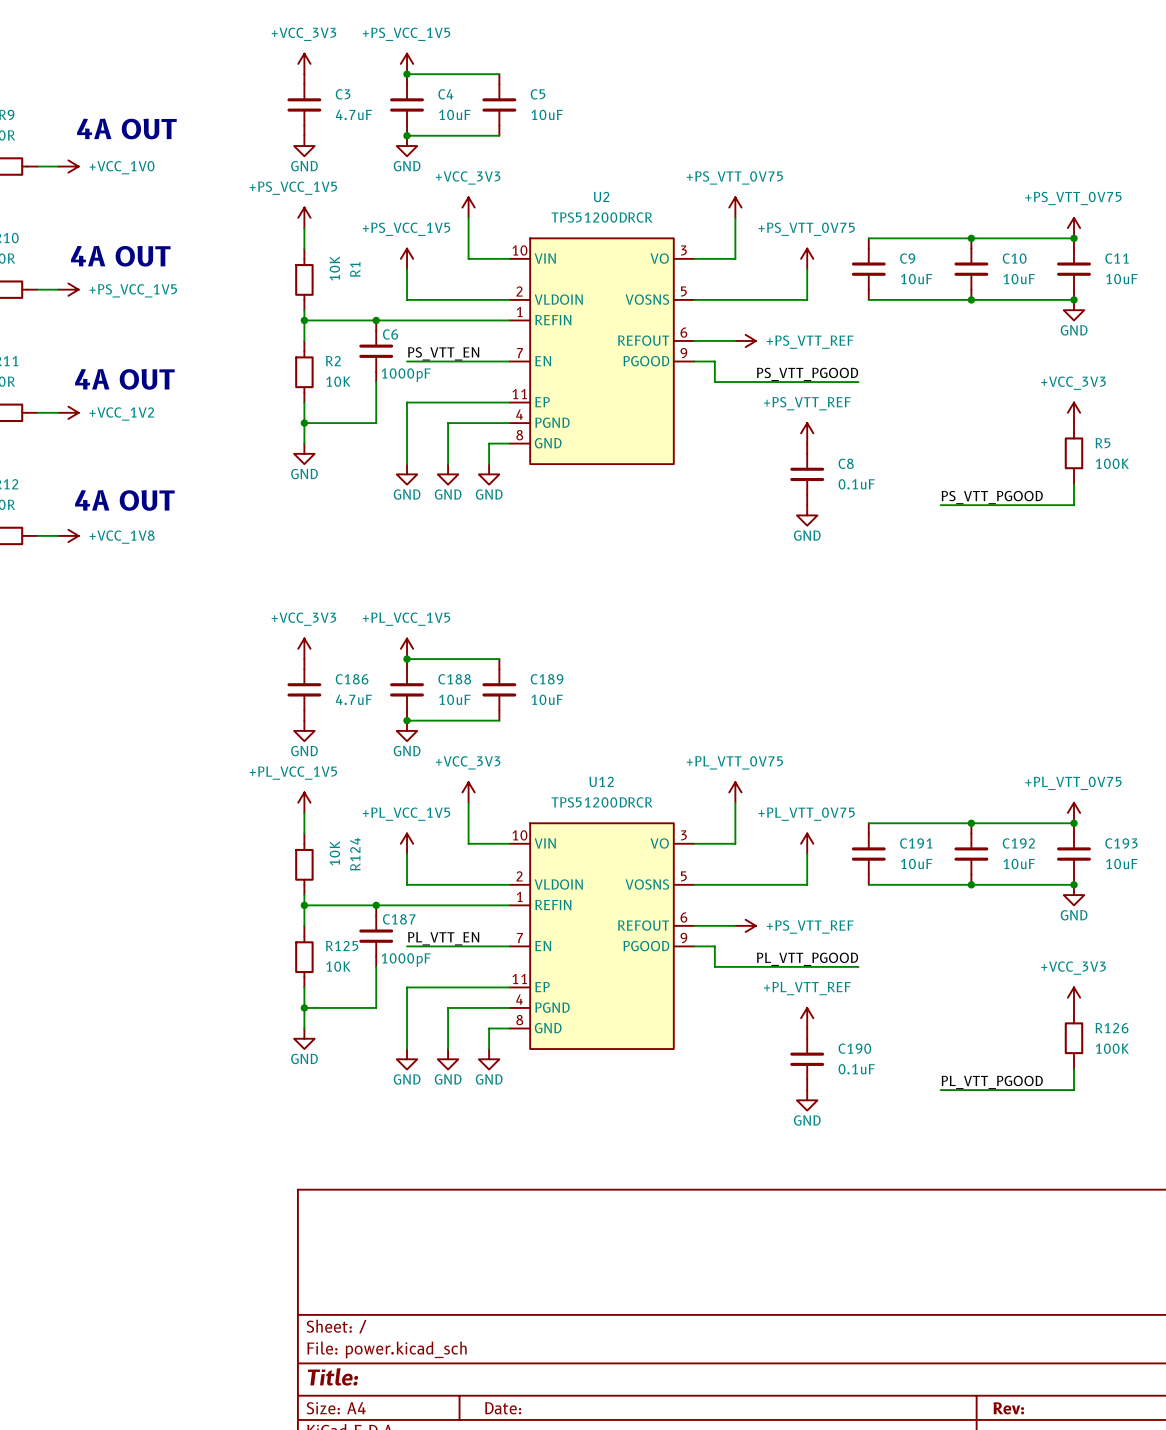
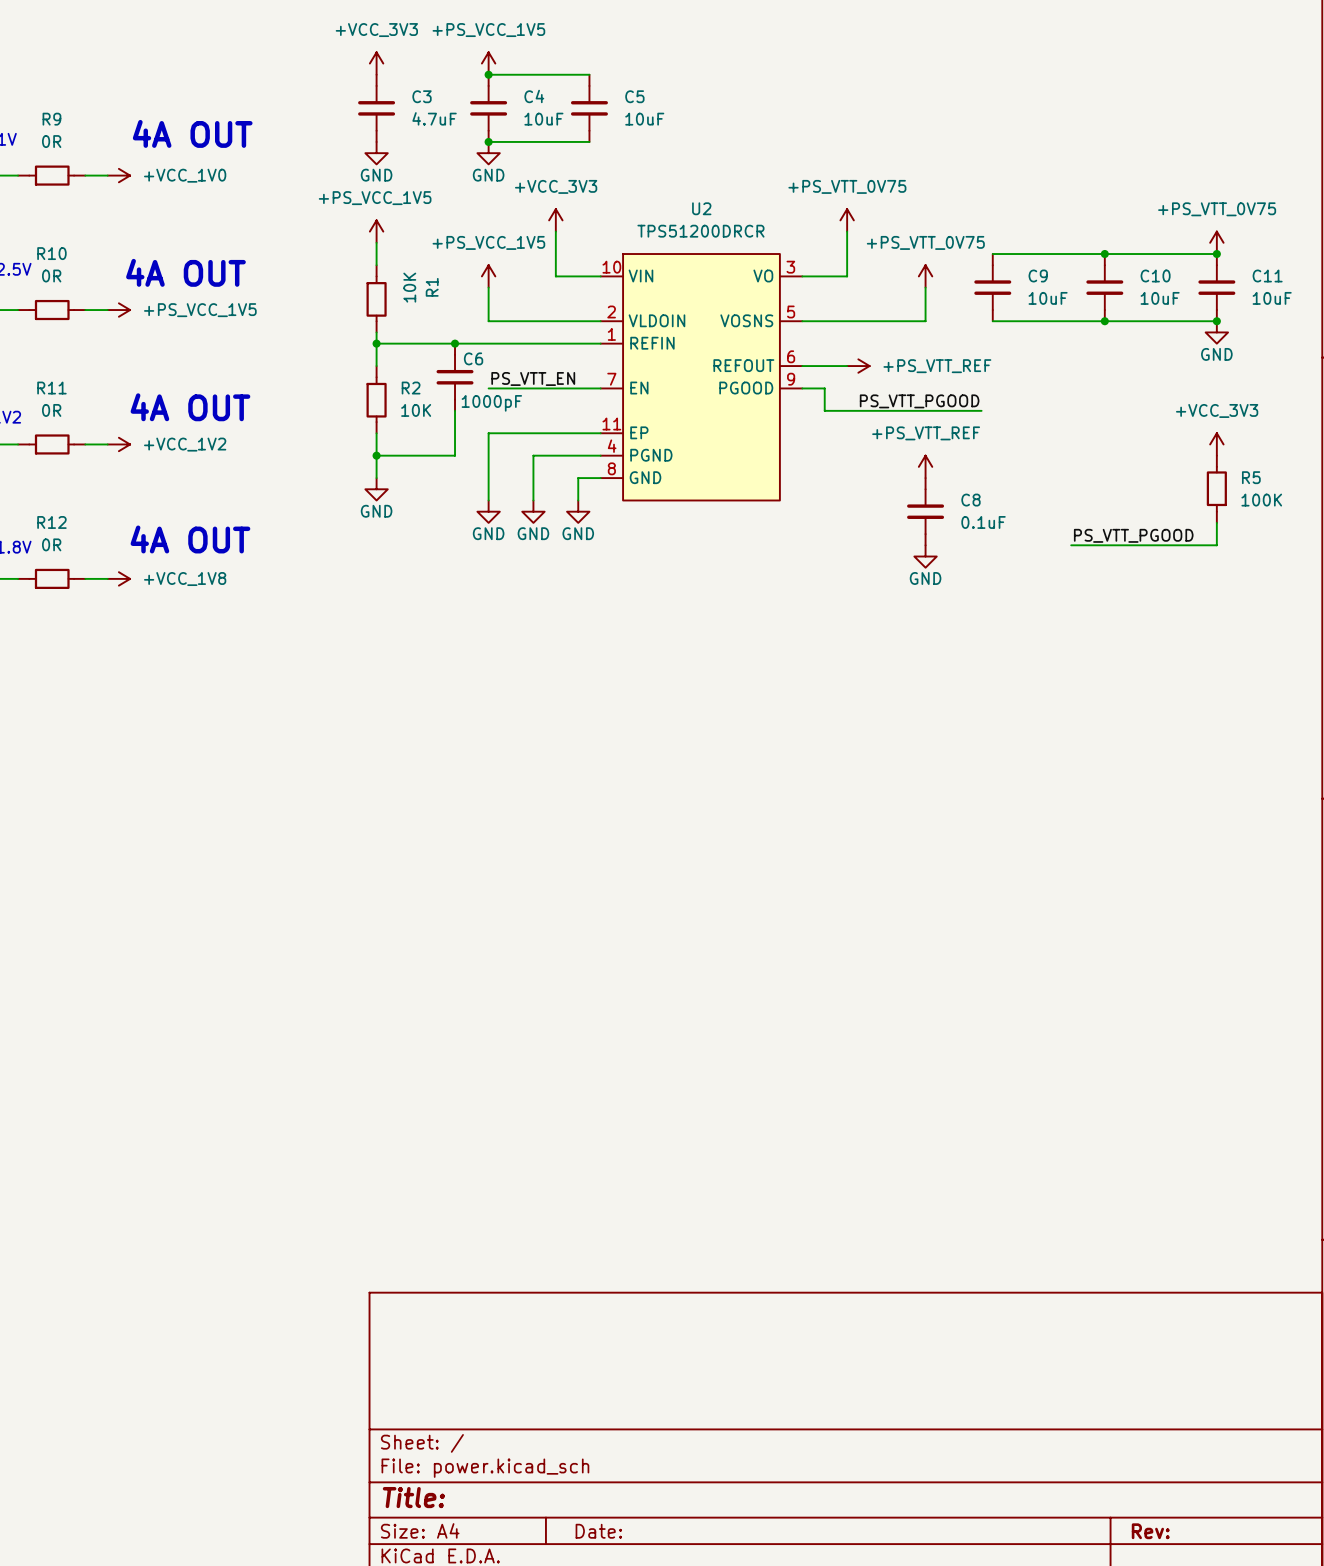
power symbol: +VCC_3V3 (304, 648) -> none
power symbol: +PL_VCC_1V5 (407, 648) -> none
wire: (407, 659) (499, 659) -> none
junction: (407, 659) -> none
C186: (304, 689) -> none
C188: (407, 689) -> none
C189: (499, 689) -> none
wire: (407, 720) (499, 720) -> none
junction: (407, 720) -> none
power symbol: GND (304, 730) -> none
power symbol: GND (407, 730) -> none
power symbol: +VCC_3V3 (468, 792) -> none
power symbol: +PL_VTT_0V75 (735, 792) -> none
power symbol: +PL_VCC_1V5 (304, 802) -> none
wire: (468, 802) (468, 843) (509, 843) -> none
wire: (735, 802) (735, 843) (694, 843) -> none
wire: (304, 813) (304, 833) -> none
power symbol: +PL_VTT_0V75 (1074, 813) -> none
wire: (868, 823) (1074, 823) -> none
junction: (971, 823) -> none
junction: (1074, 823) -> none
power symbol: +PL_VCC_1V5 (407, 843) -> none
power symbol: +PL_VTT_0V75 (807, 843) -> none
wire: (407, 854) (407, 884) (509, 884) -> none
wire: (807, 854) (807, 884) (694, 884) -> none
C191: (868, 854) -> none
C192: (971, 854) -> none
C193: (1074, 854) -> none
R124: (304, 864) -> none
wire: (868, 884) (1074, 884) -> none
junction: (971, 884) -> none
junction: (1074, 884) -> none
wire: (304, 895) (304, 925) -> none
power symbol: GND (1074, 895) -> none
wire: (304, 905) (509, 905) -> none
junction: (304, 905) -> none
junction: (376, 905) -> none
wire: (694, 925) (735, 925) -> none
power symbol: +PS_VTT_REF (745, 925) -> none
C187: (376, 936) -> none
U12: TPS51200DRCR (601, 936) -> none
label: PL_VTT_EN (443, 938) -> none
wire: (407, 946) (509, 946) -> none
wire: (694, 946) (714, 946) (714, 966) (858, 966) -> none
R125: (304, 956) -> none
label: PL_VTT_PGOOD (807, 959) -> none
wire: (376, 966) (376, 1007) (304, 1007) -> none
wire: (304, 987) (304, 1028) -> none
wire: (509, 987) (407, 987) (407, 1049) -> none
power symbol: +VCC_3V3 (1074, 997) -> none
junction: (304, 1007) -> none
wire: (509, 1007) (448, 1007) (448, 1049) -> none
power symbol: +PL_VTT_REF (807, 1018) -> none
wire: (509, 1028) (489, 1028) (489, 1049) -> none
power symbol: GND (304, 1038) -> none
R126: (1074, 1038) -> none
power symbol: GND (407, 1059) -> none
power symbol: GND (448, 1059) -> none
power symbol: GND (489, 1059) -> none
C190: (807, 1059) -> none
wire: (1074, 1069) (1074, 1090) (940, 1090) -> none
label: PL_VTT_PGOOD (992, 1082) -> none
power symbol: GND (807, 1100) -> none

